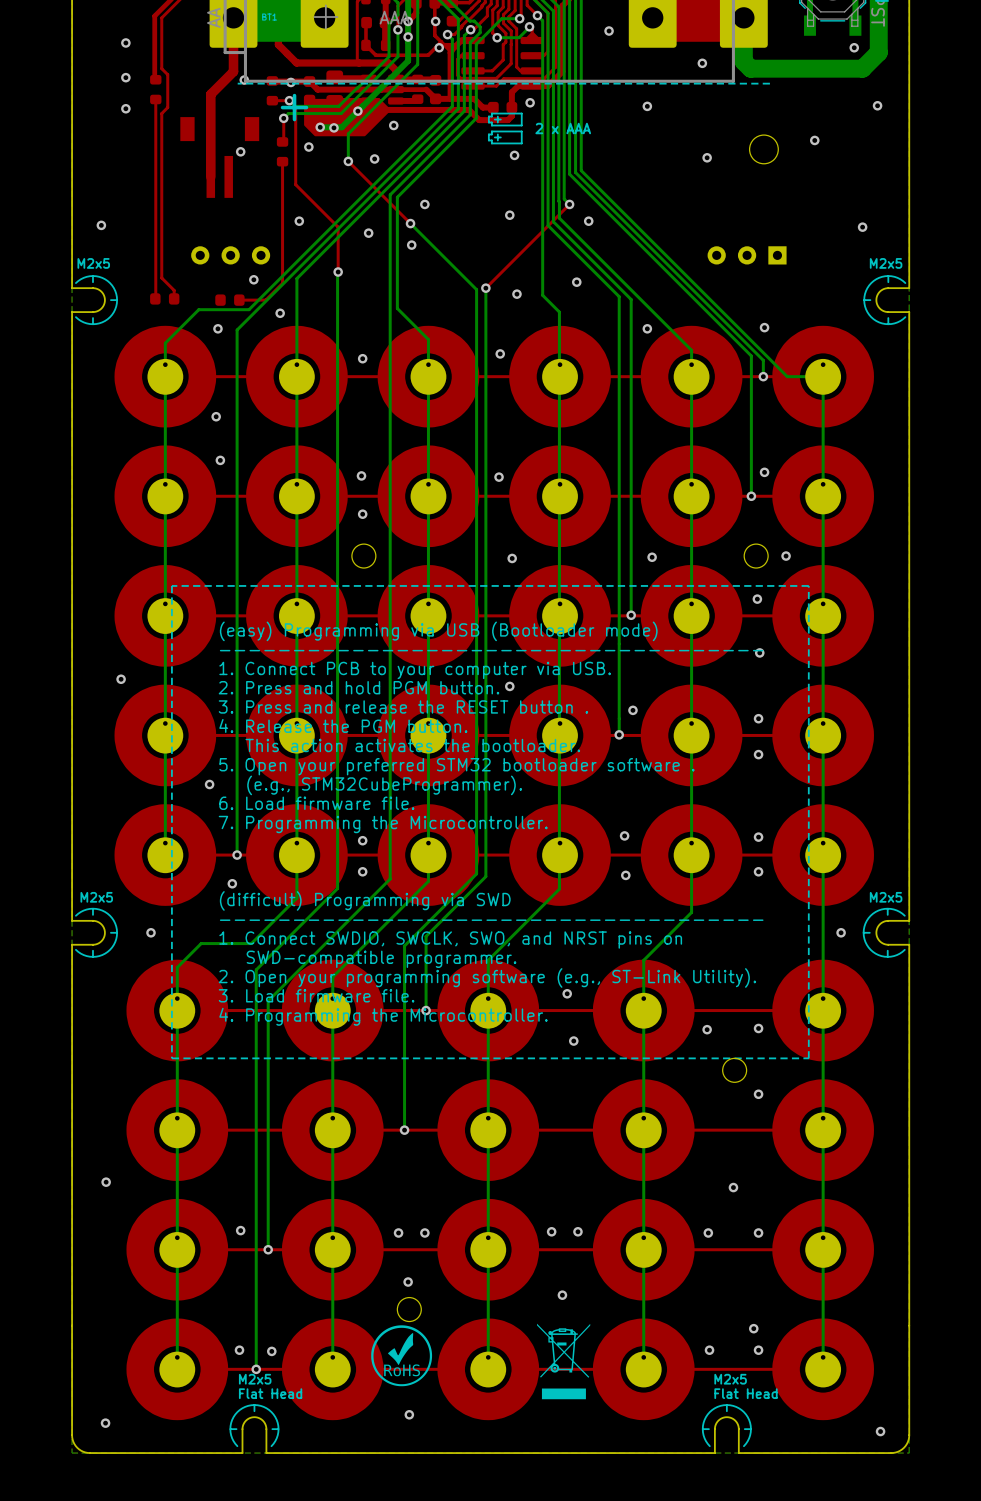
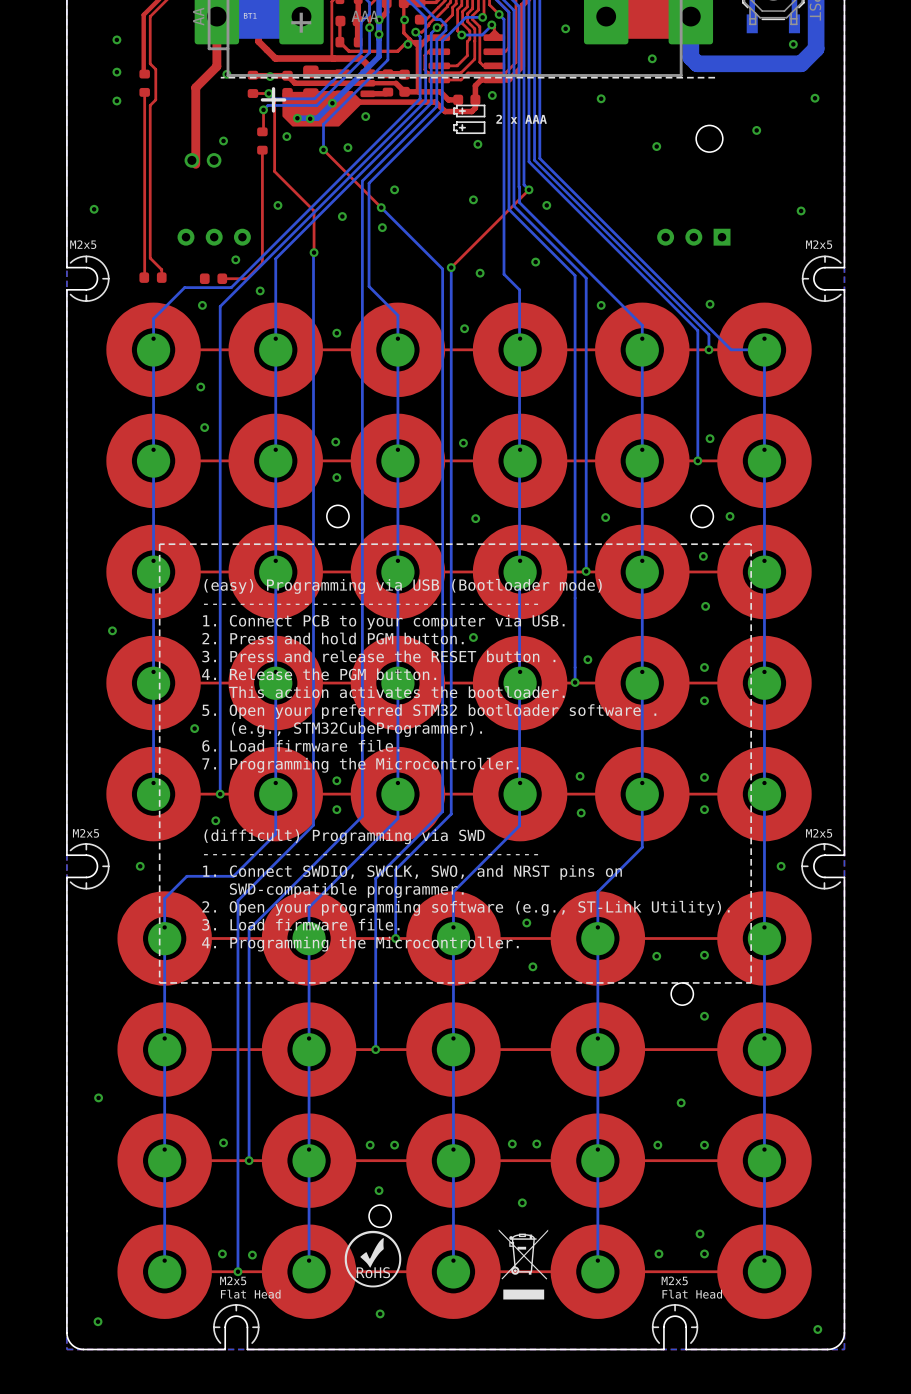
part: (219, 157) -> none
part: none -> (202, 160)

